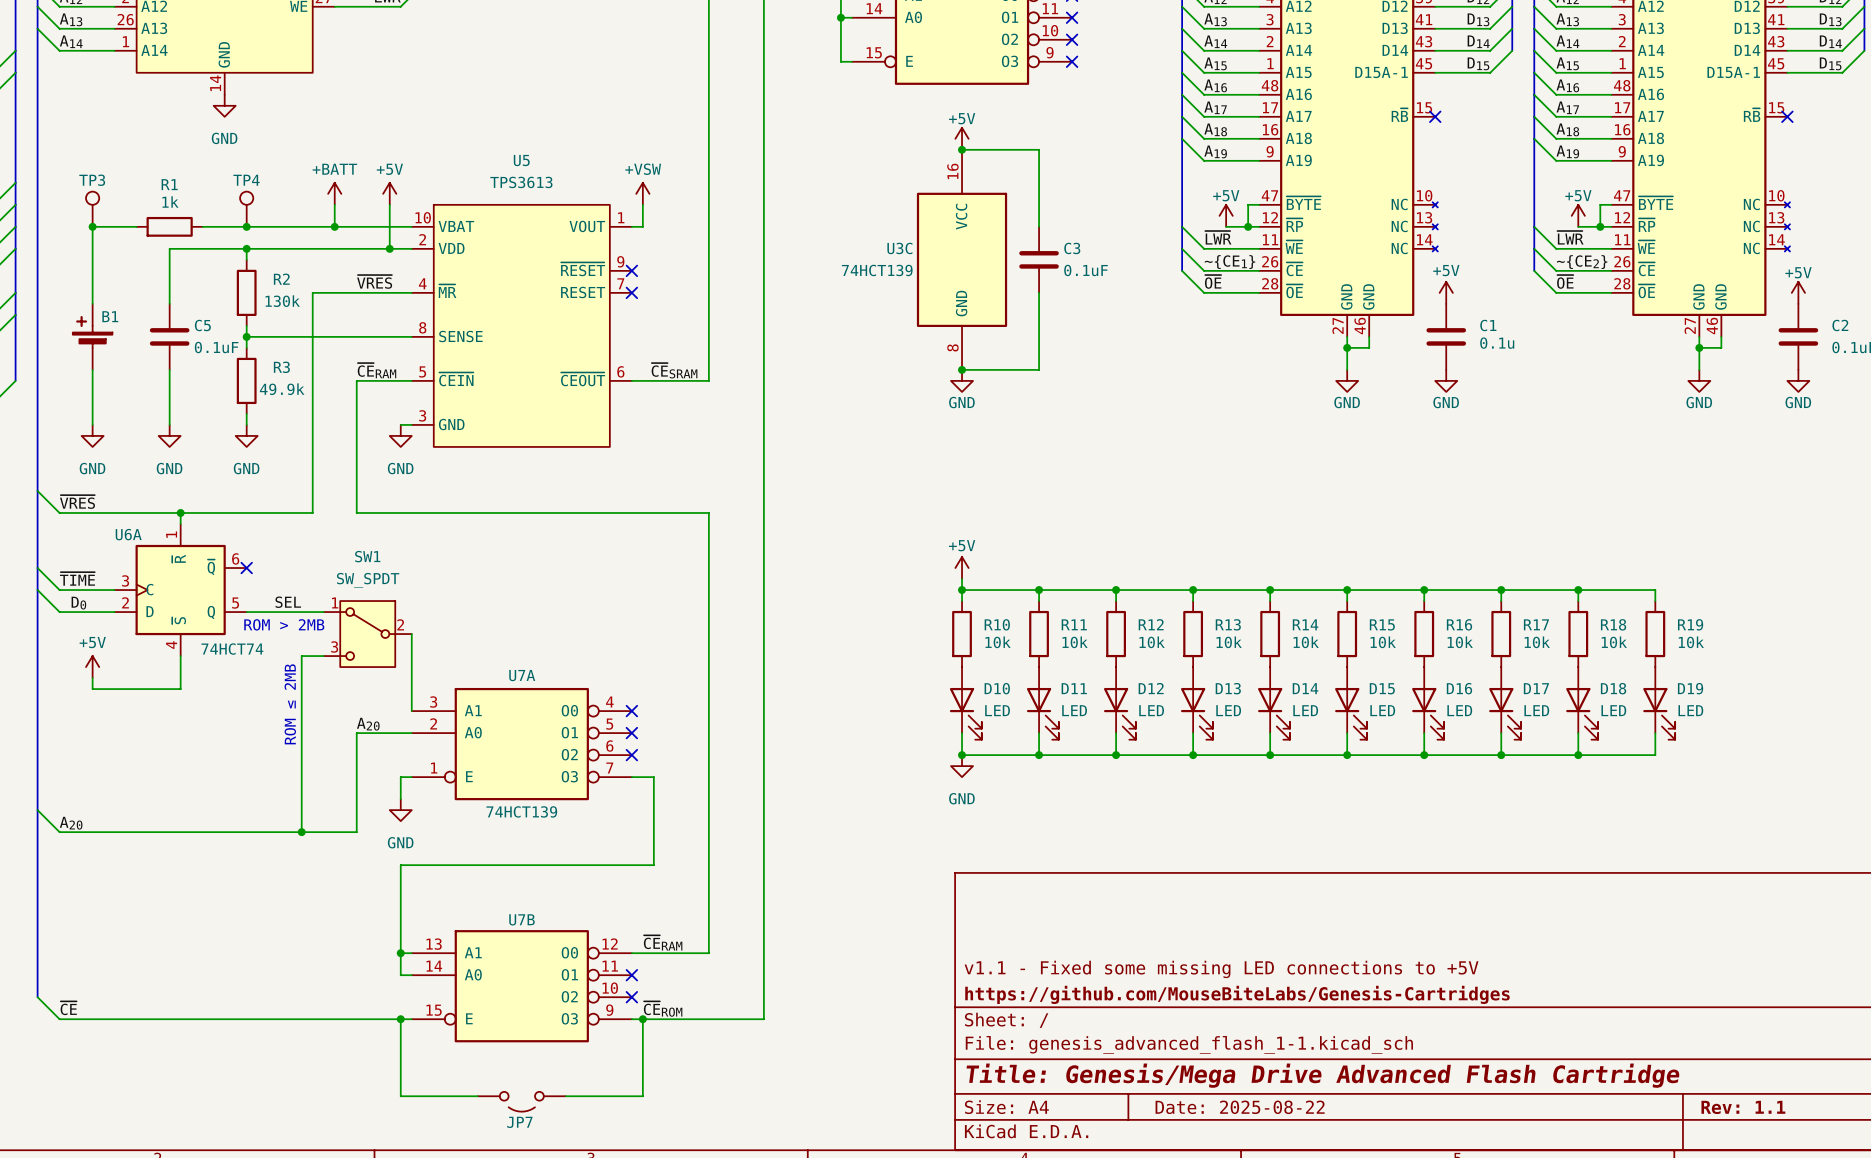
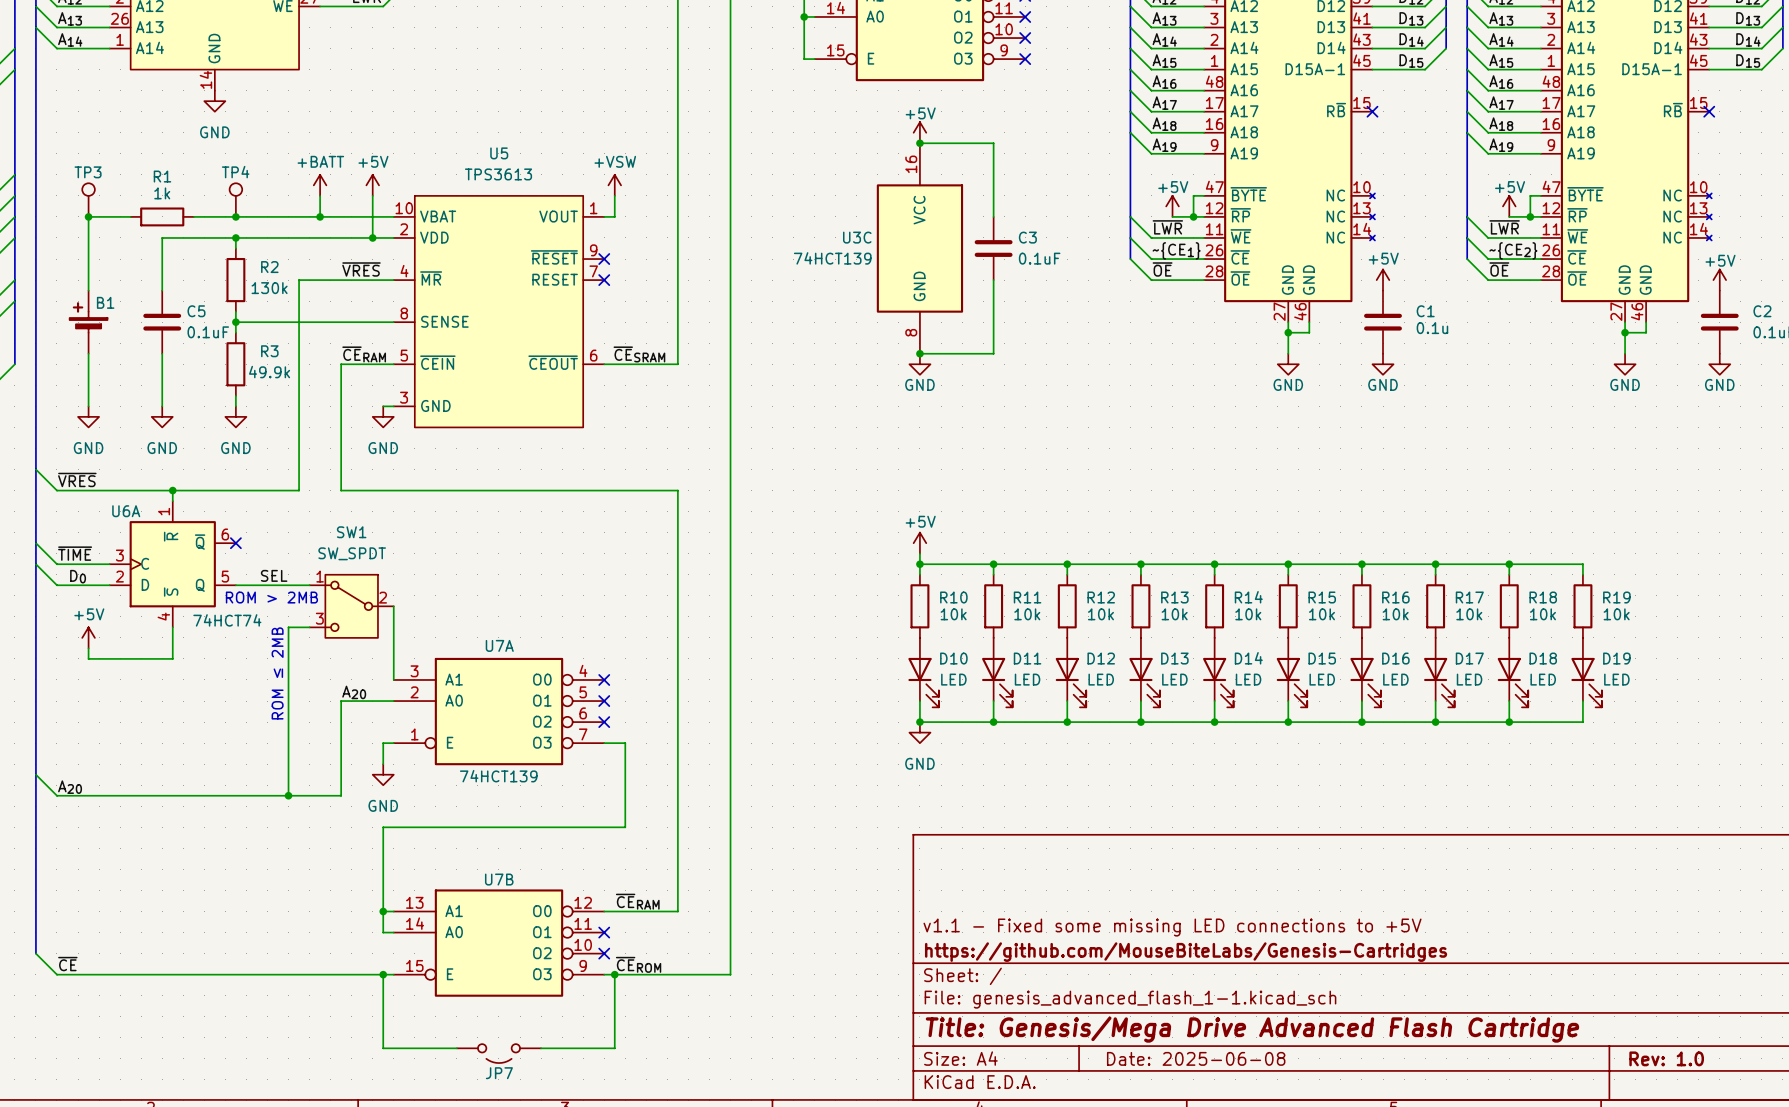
title block: Date: 2025-08-22 (1240, 1107) -> Date: 2025-06-08 (1196, 1058)
title block: Rev: 1.1 (1743, 1107) -> Rev: 1.0 (1666, 1058)

